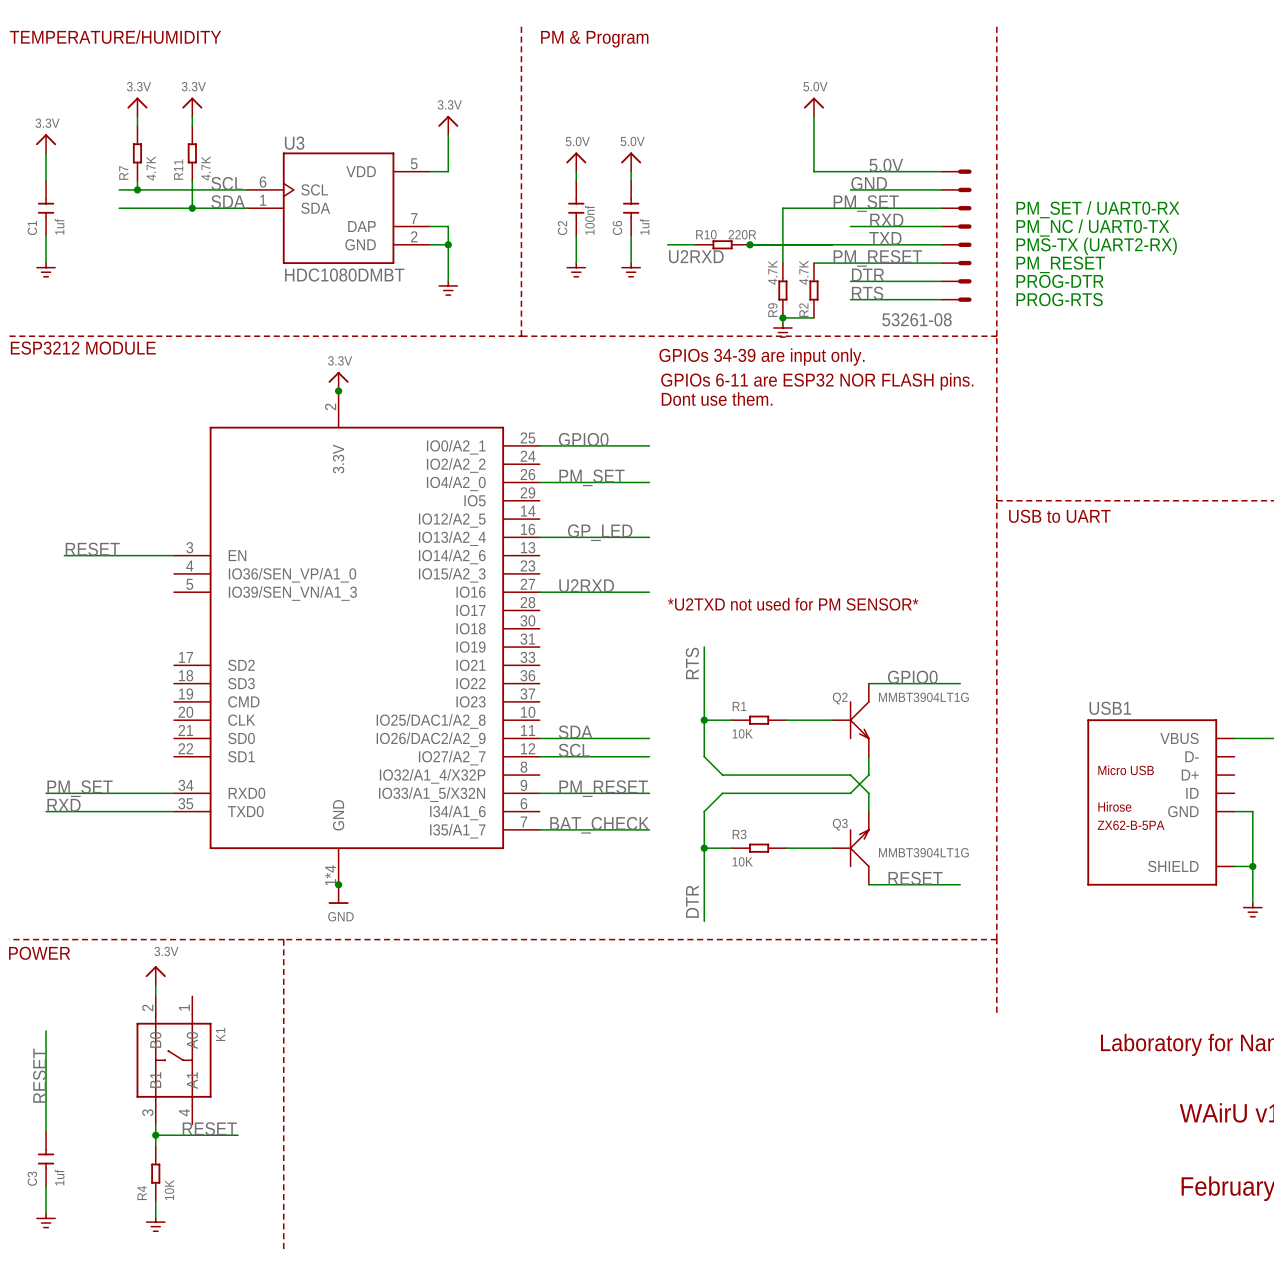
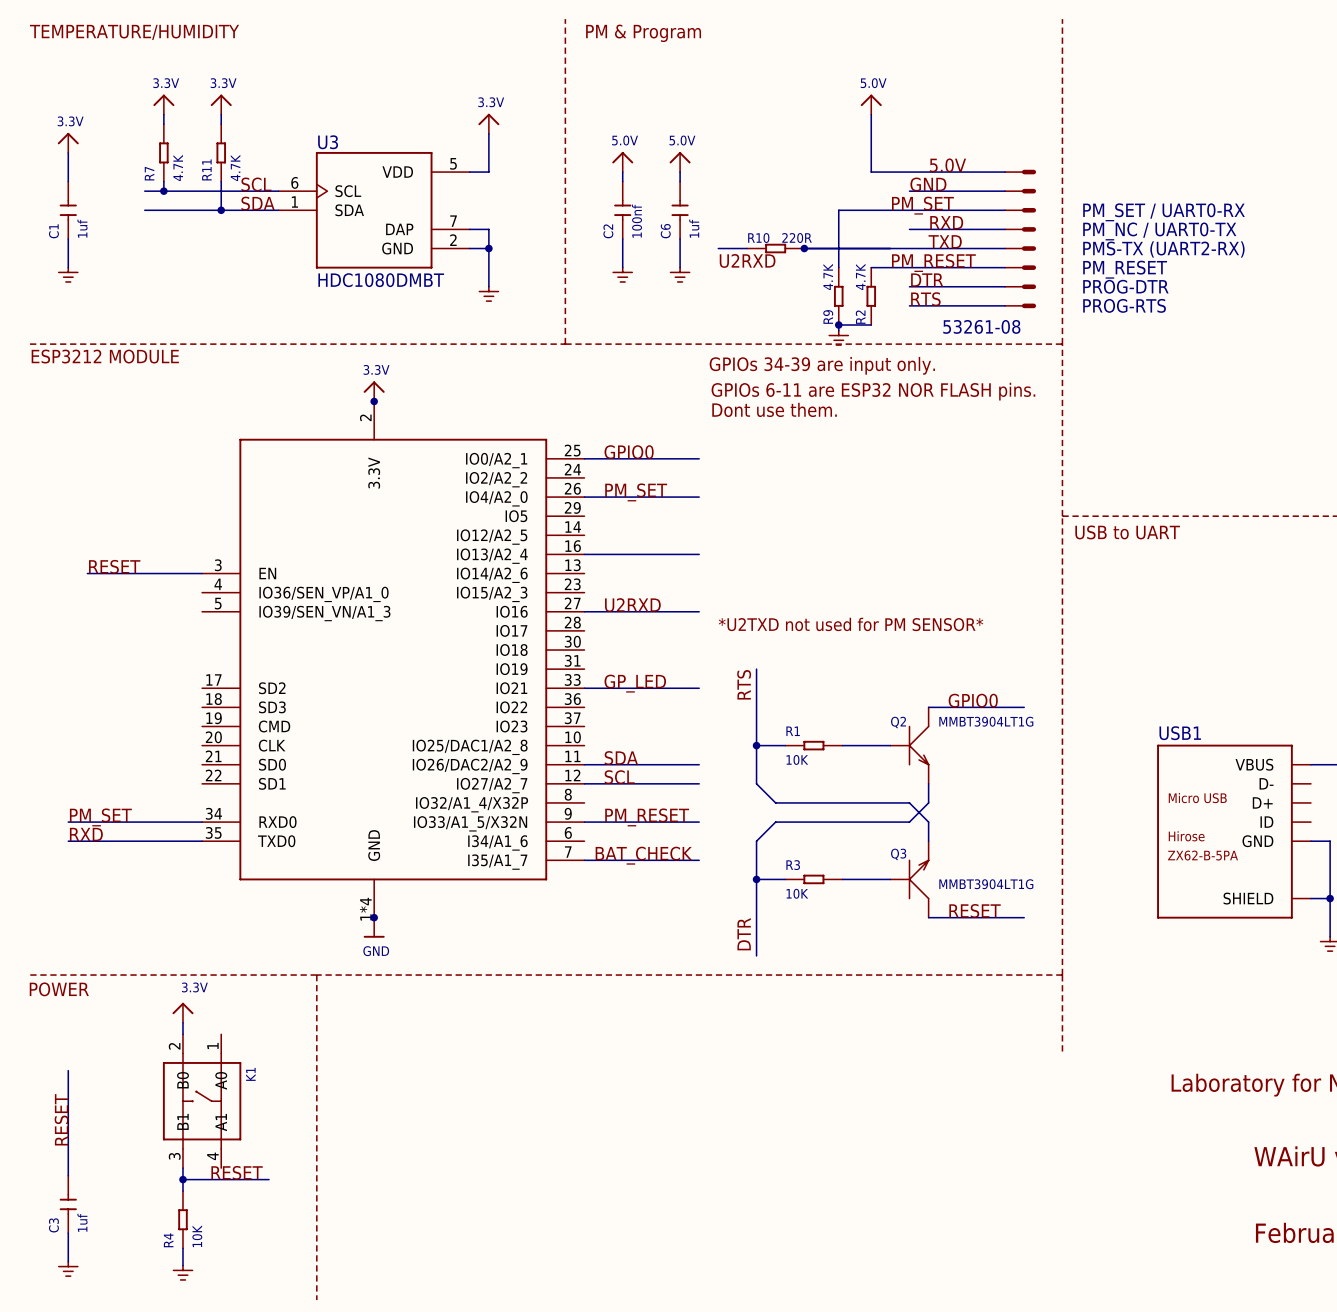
label position: GP_LED (600, 532) -> GP_LED (635, 683)
wire: none -> (584, 688) (699, 688)

